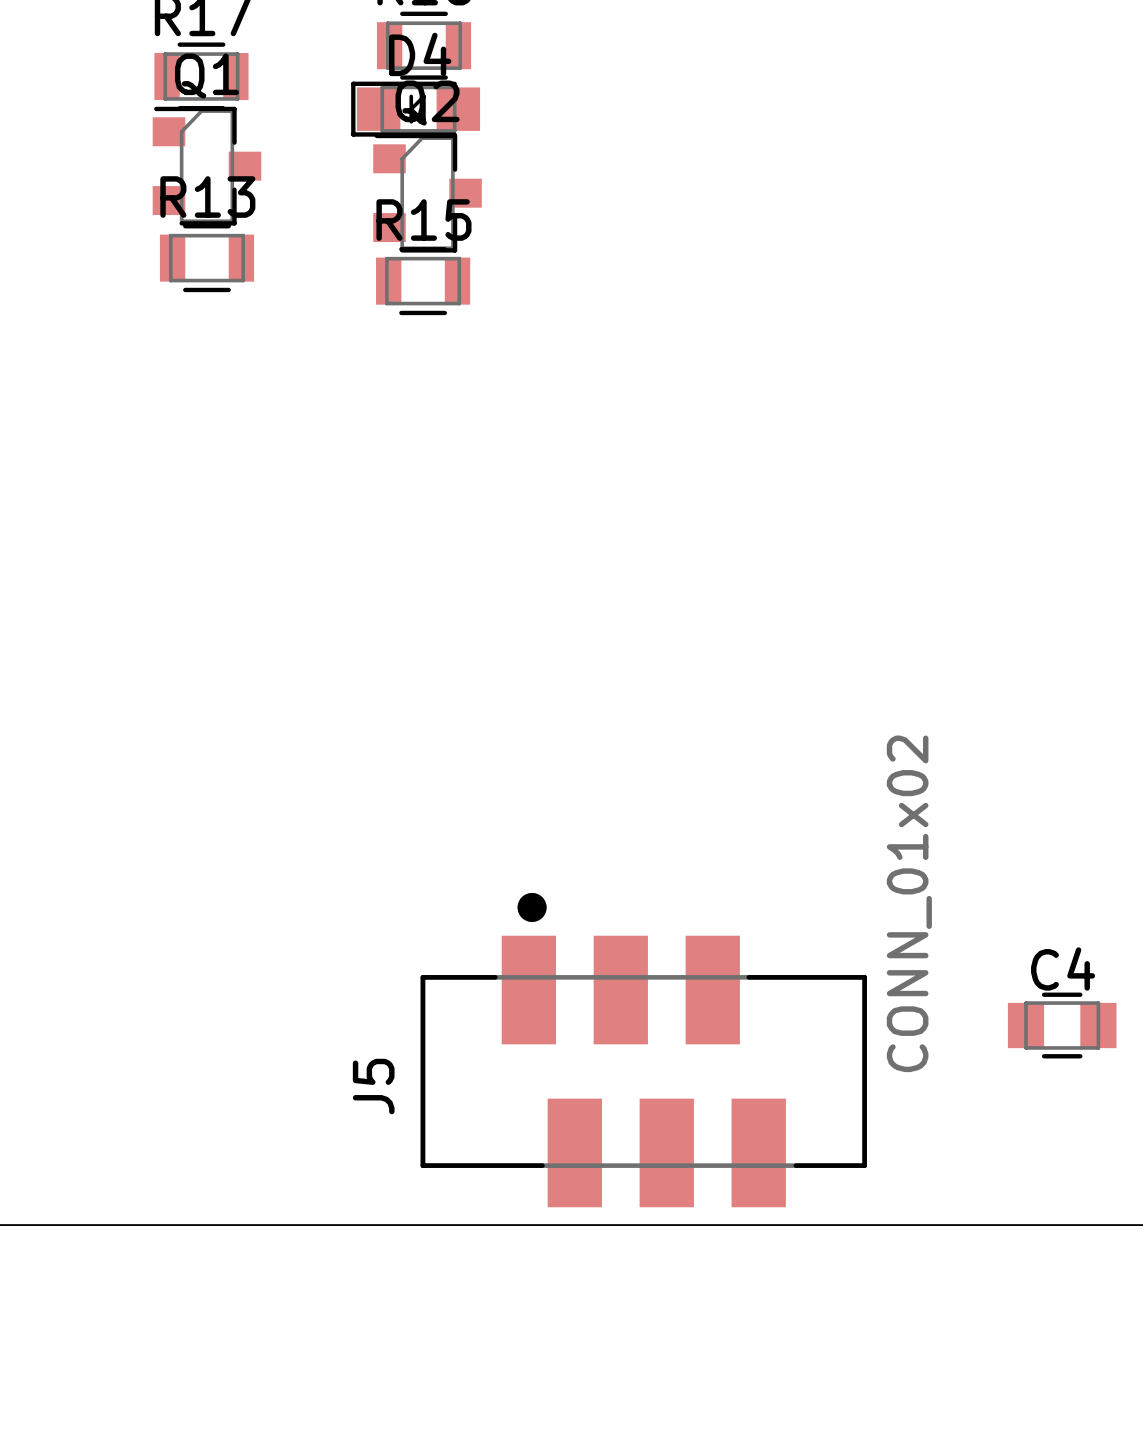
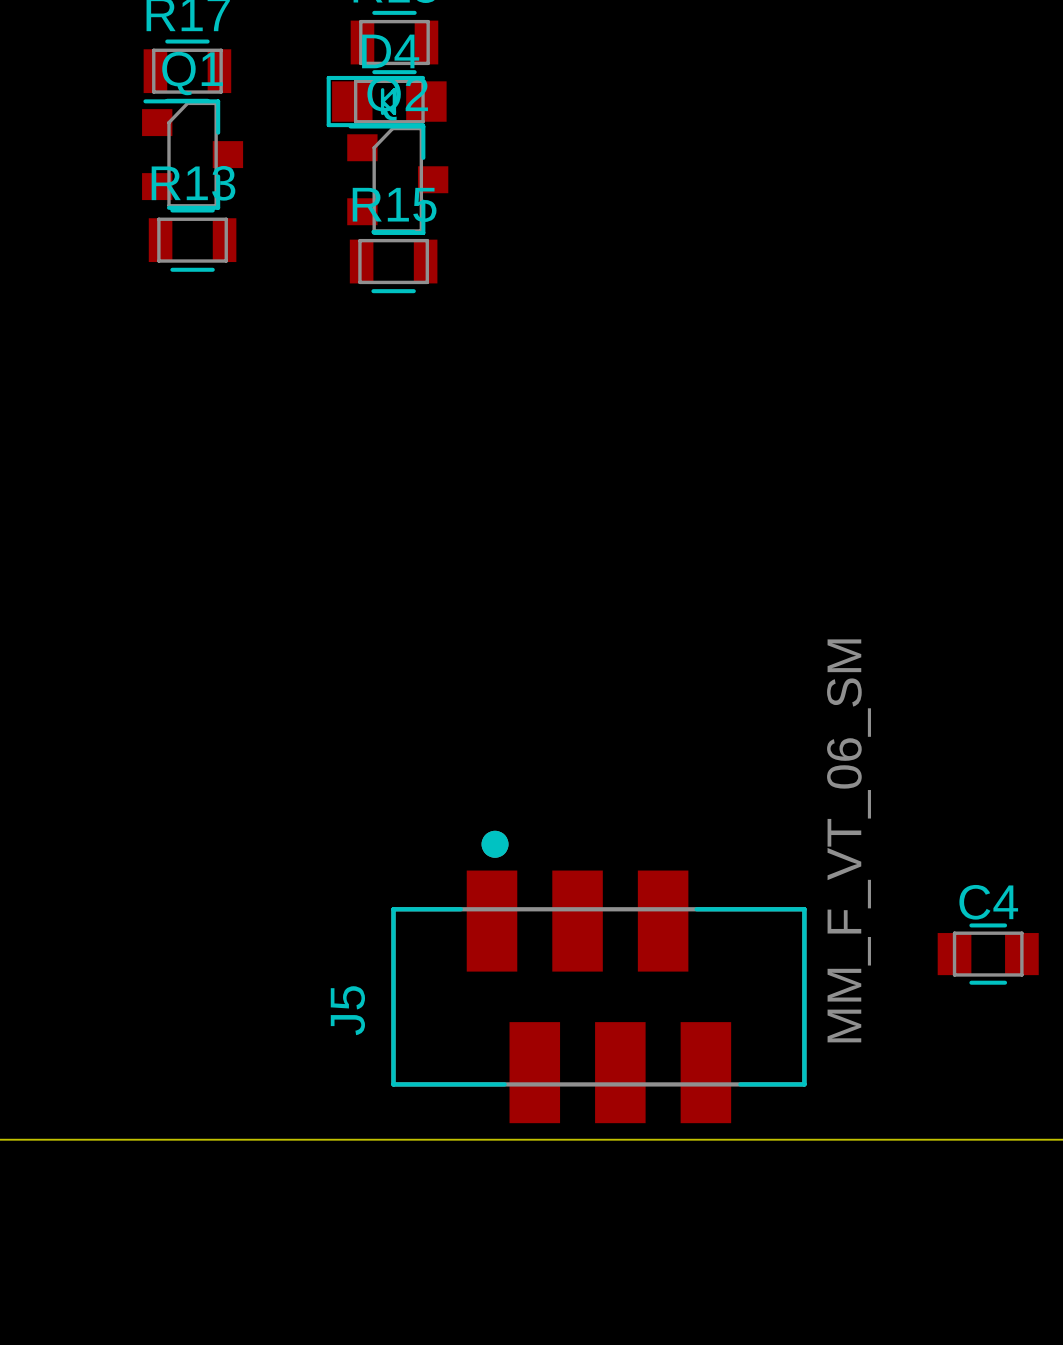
J5 value: CONN_01x02 (909, 903) -> MM_F_VT_06_SM (849, 840)

